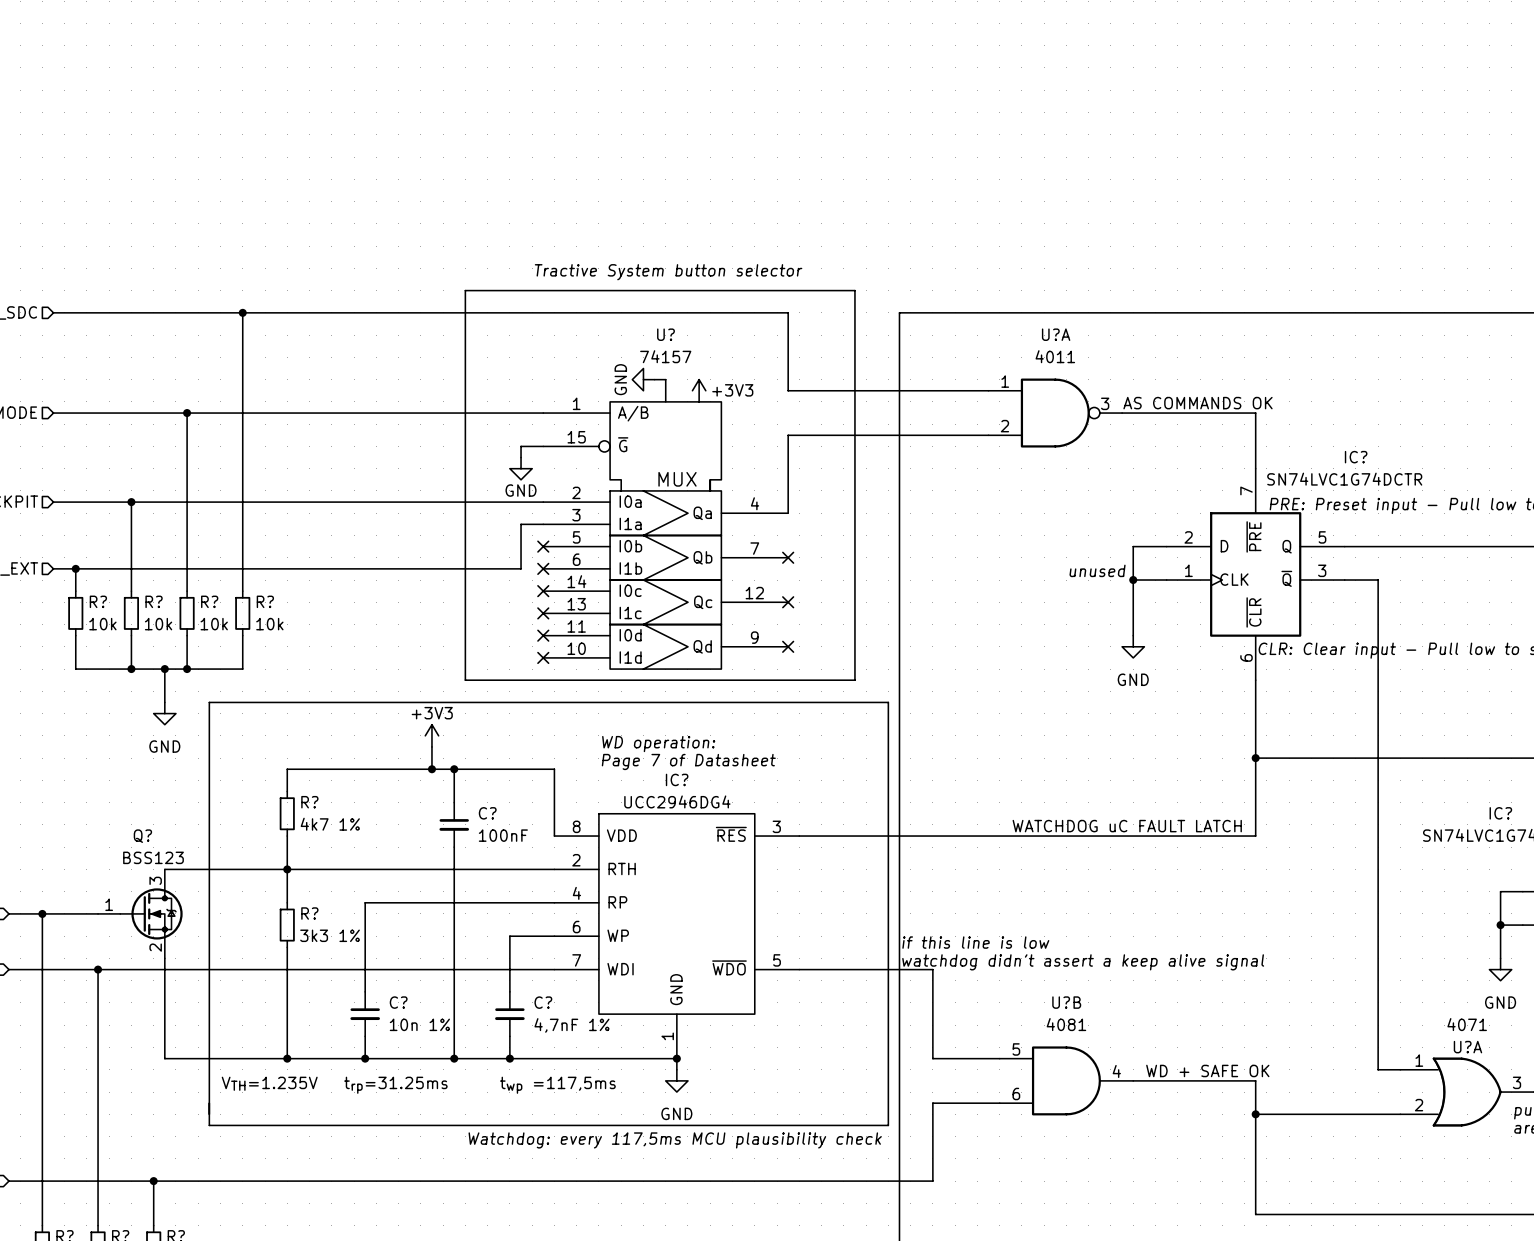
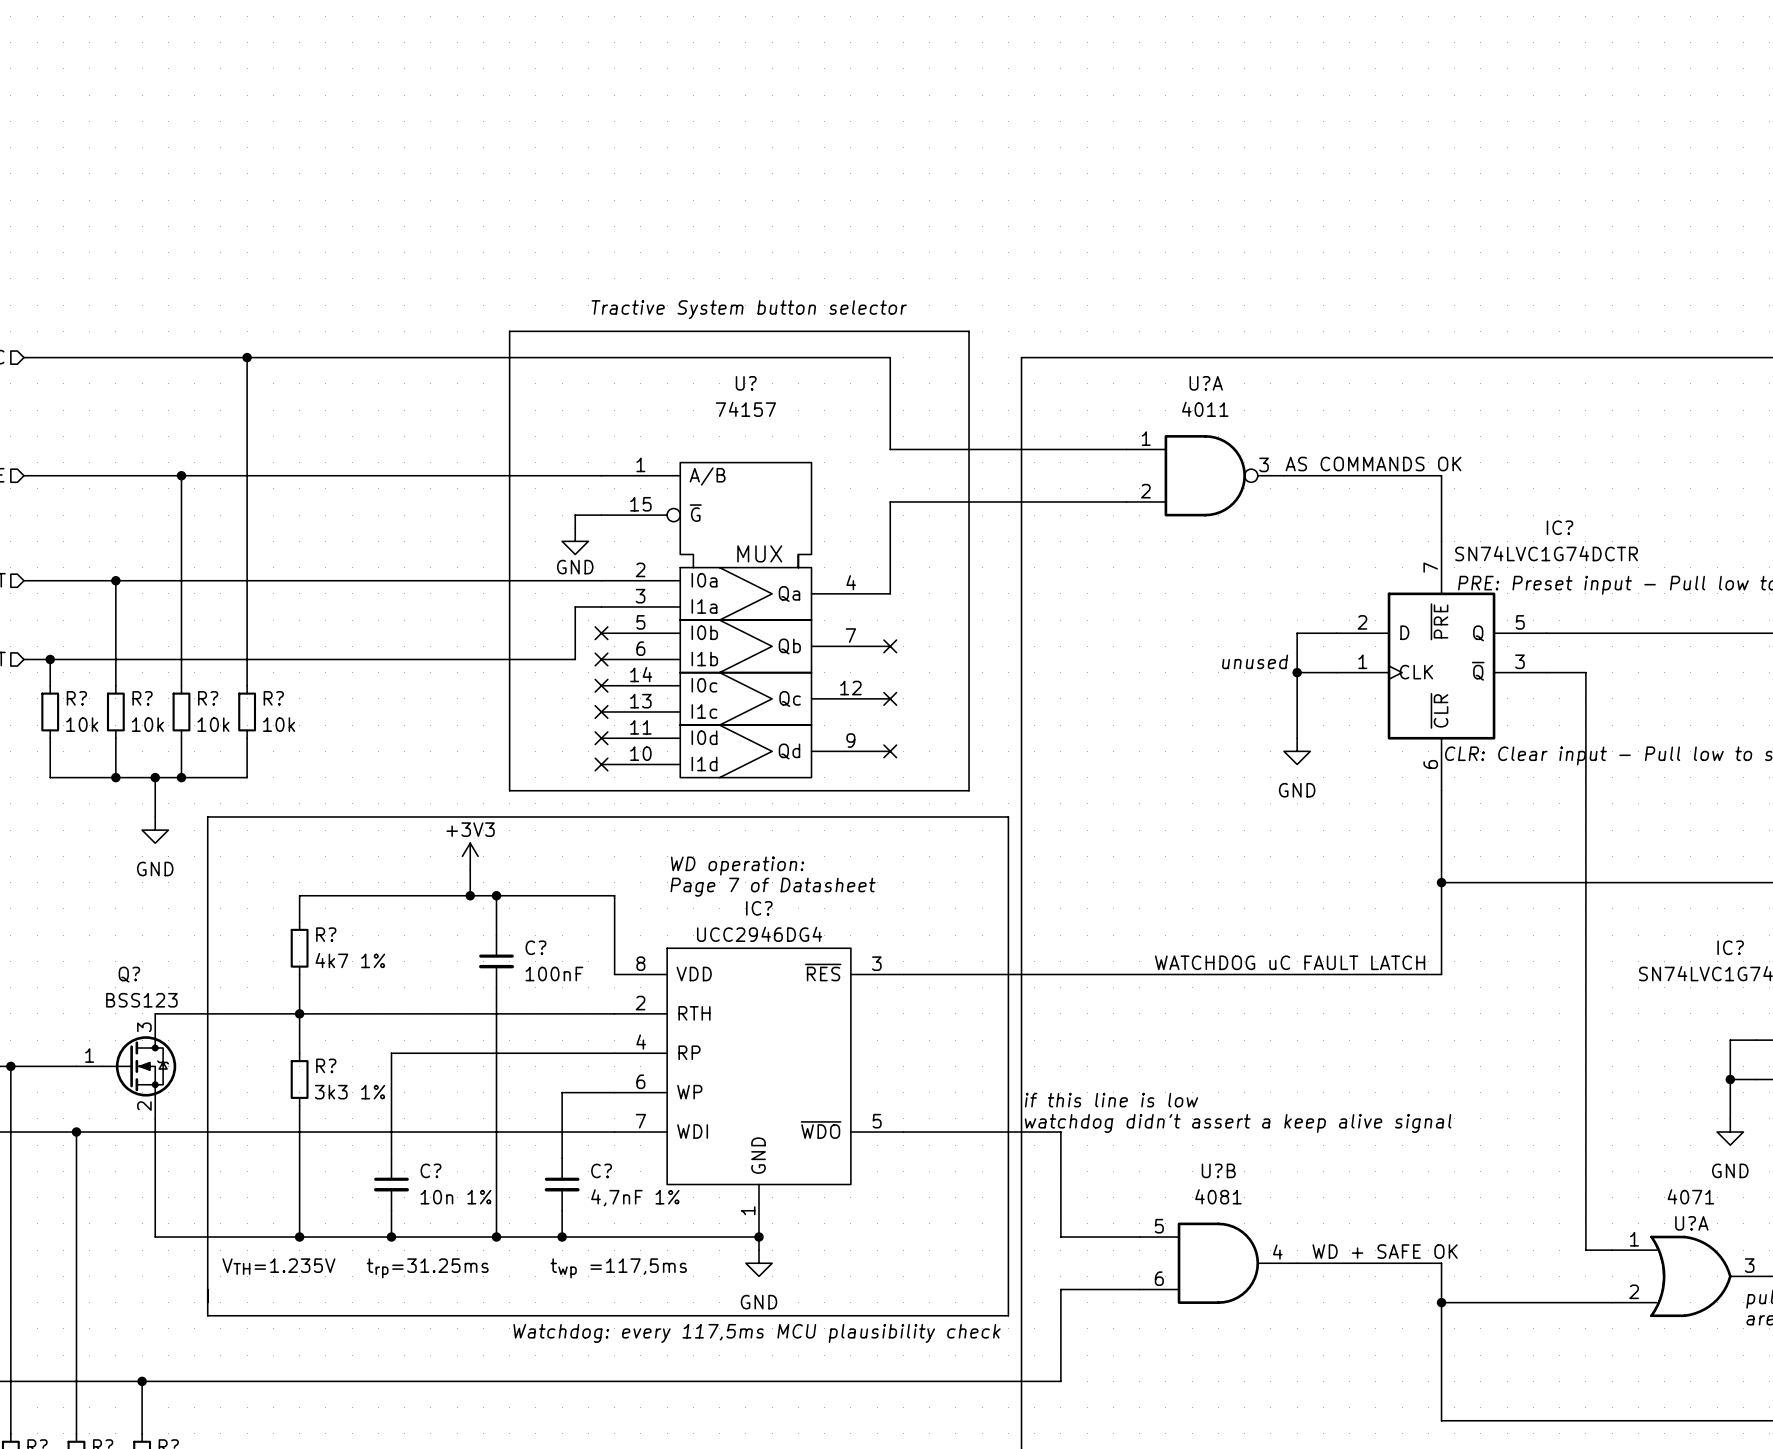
power symbol: GND (643, 379) -> none
wire: (654, 379) (665, 379) (665, 401) -> none
power symbol: +3V3 (699, 390) -> none

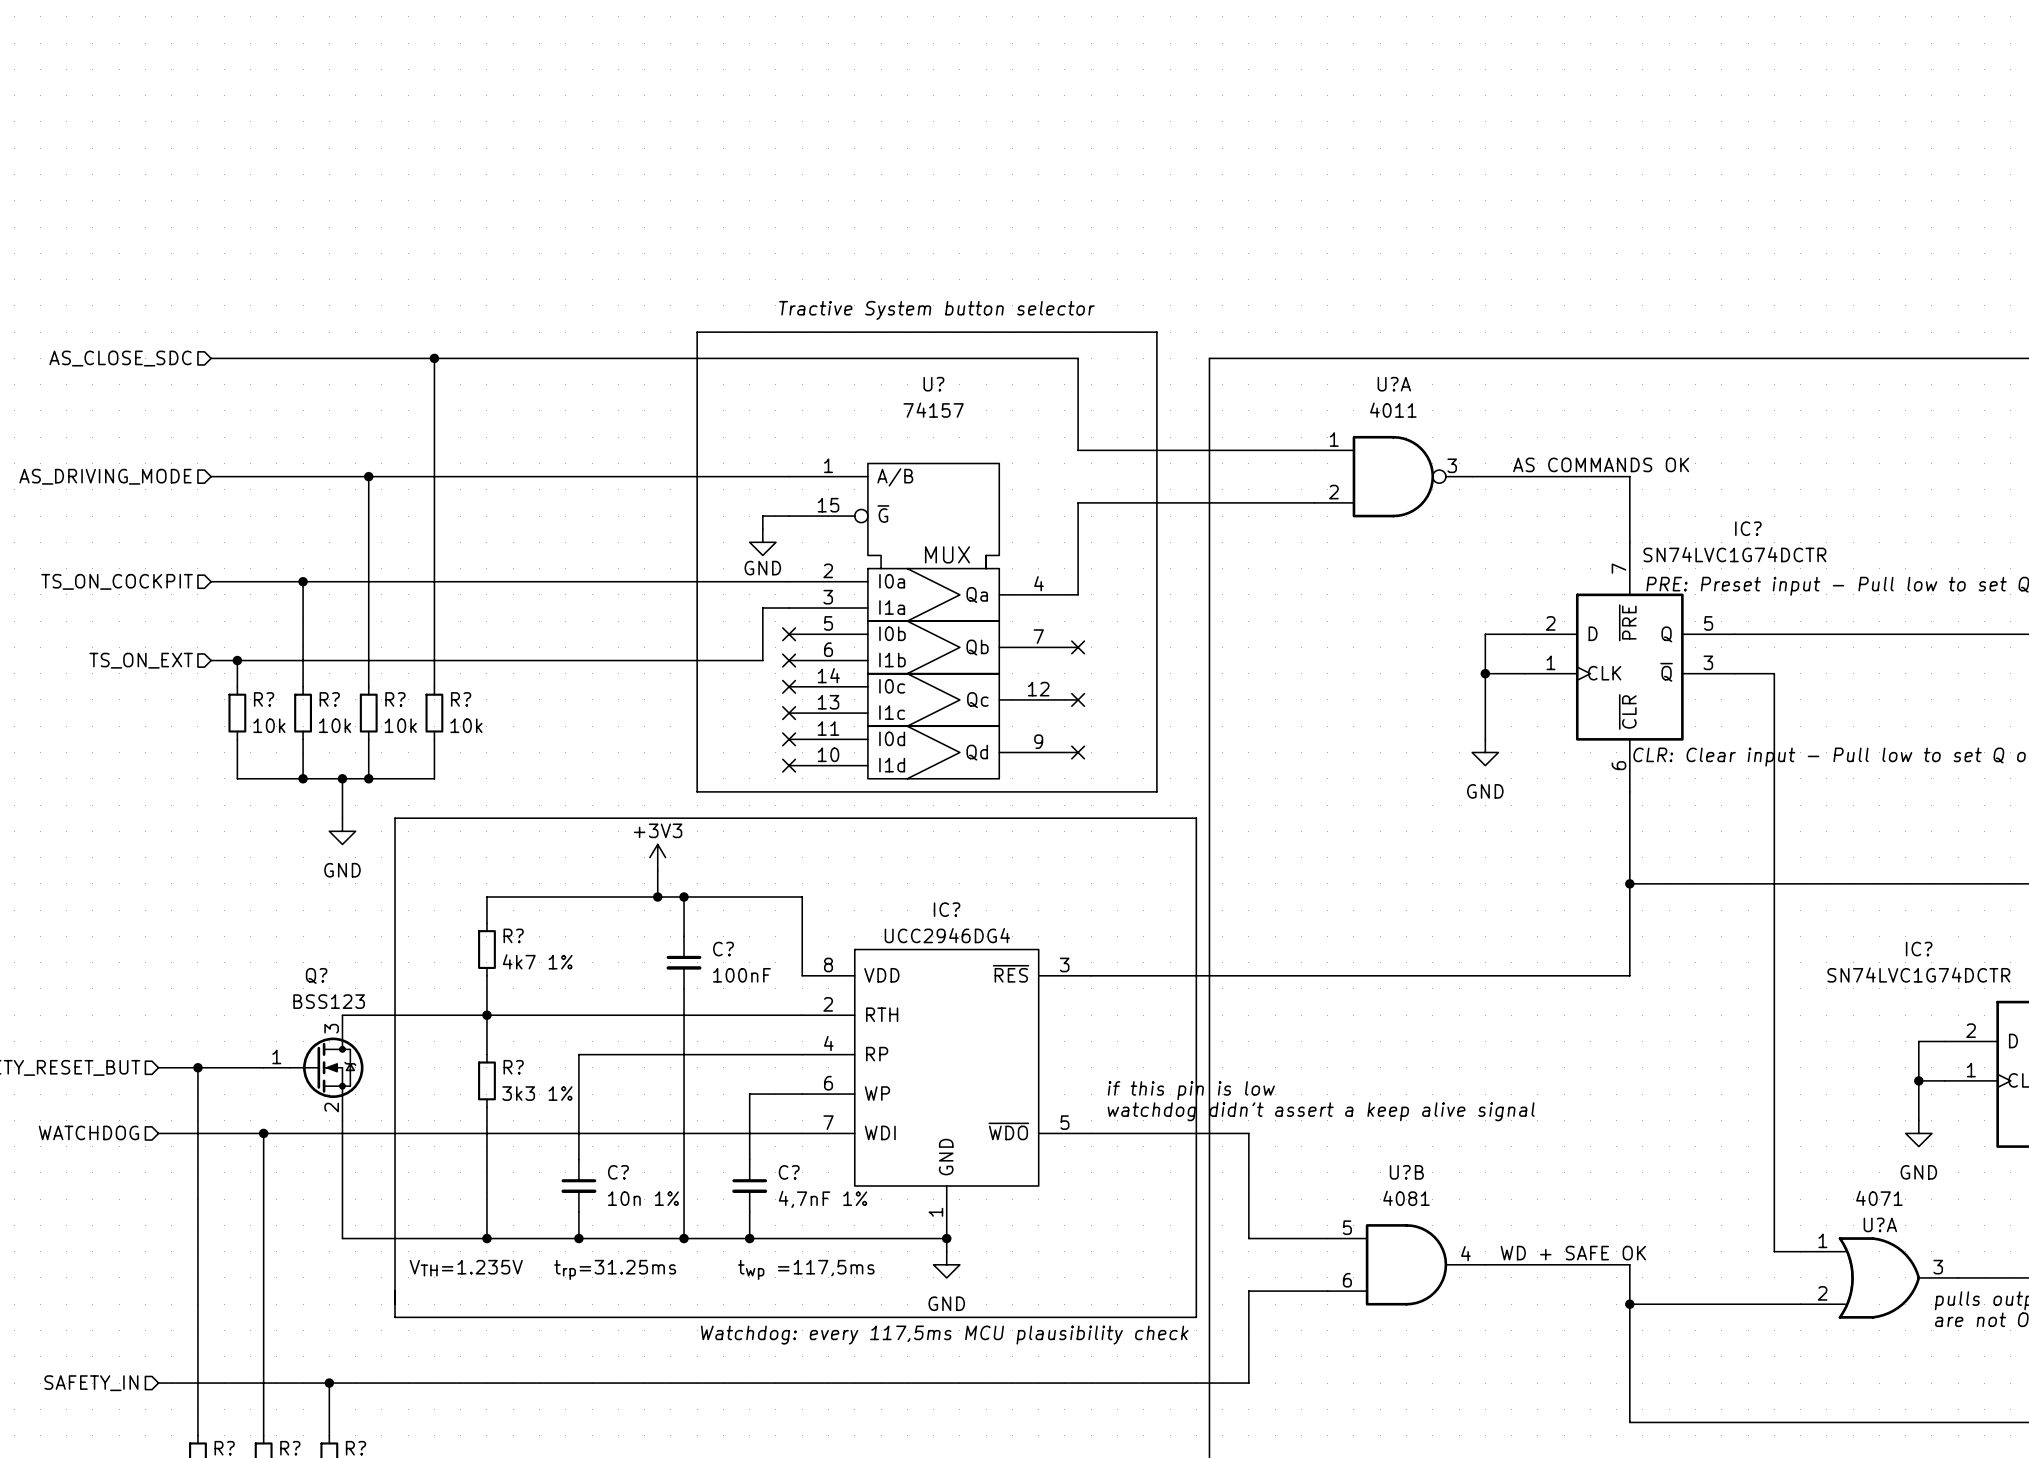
label position: AS COMMANDS OK (1373, 464) -> AS COMMANDS OK (1601, 464)
text: unused (1255, 661) -> none
text: WD operation: (737, 866) -> none
text: Page 7 of Datasheet (773, 887) -> none
label: WATCHDOG uC FAULT LATCH (1290, 962) -> none
text: if this line is low (1111, 1100) -> if this pin is low (1191, 1090)
text position: watchdog didn't assert a keep alive signal (1238, 1123) -> watchdog didn't assert a keep alive signal (1321, 1111)

